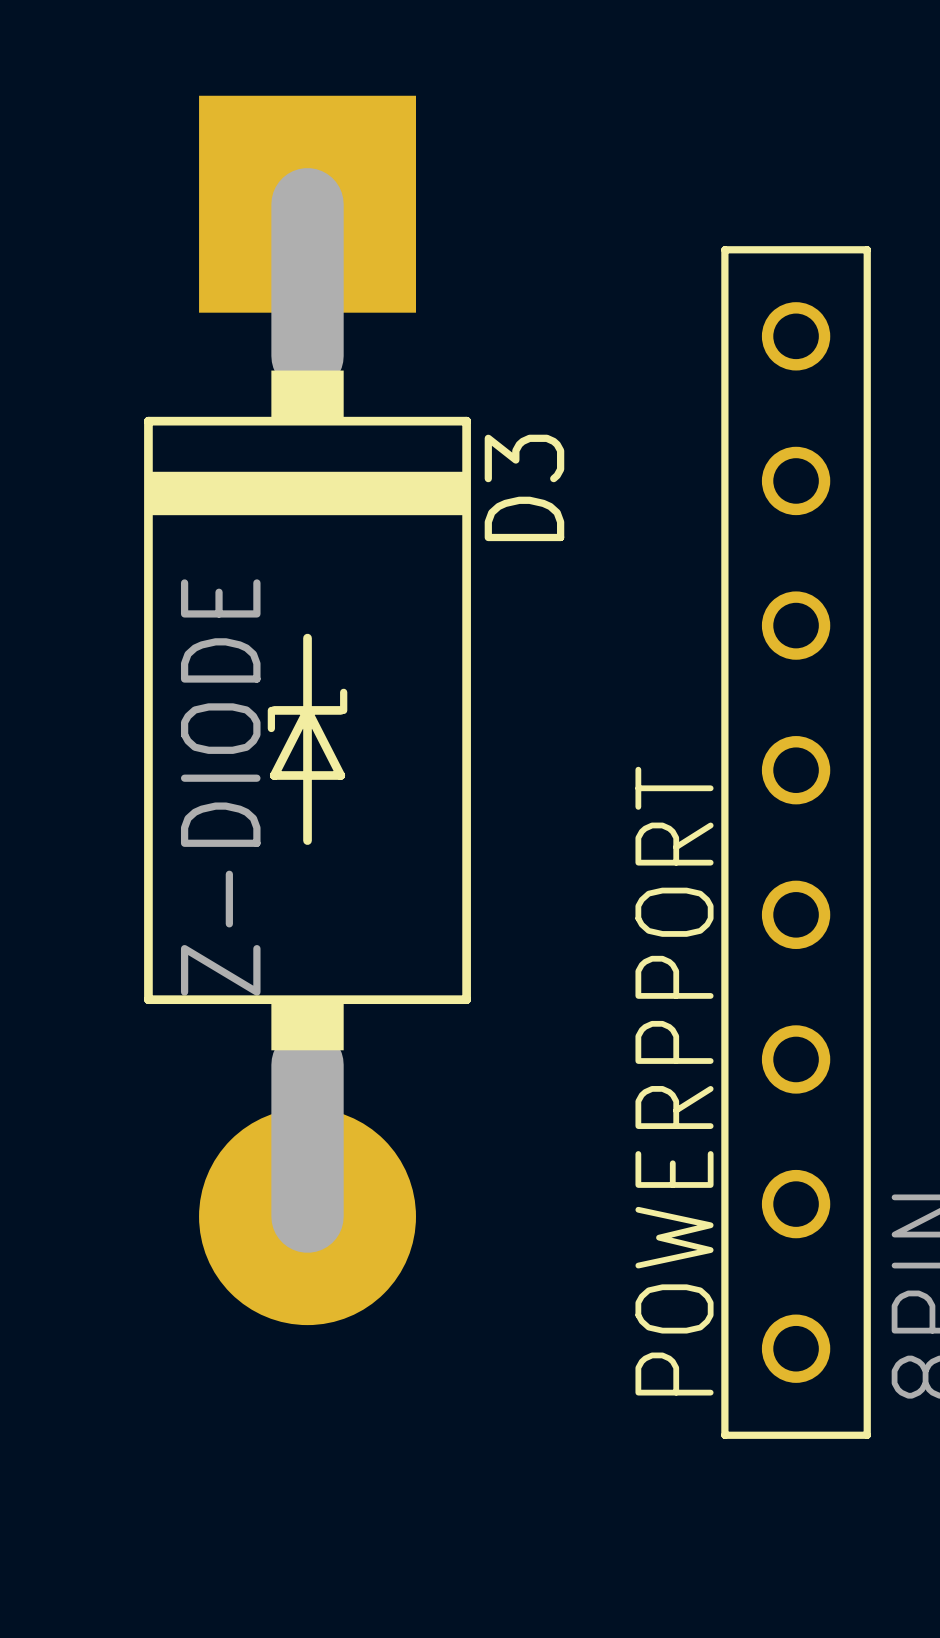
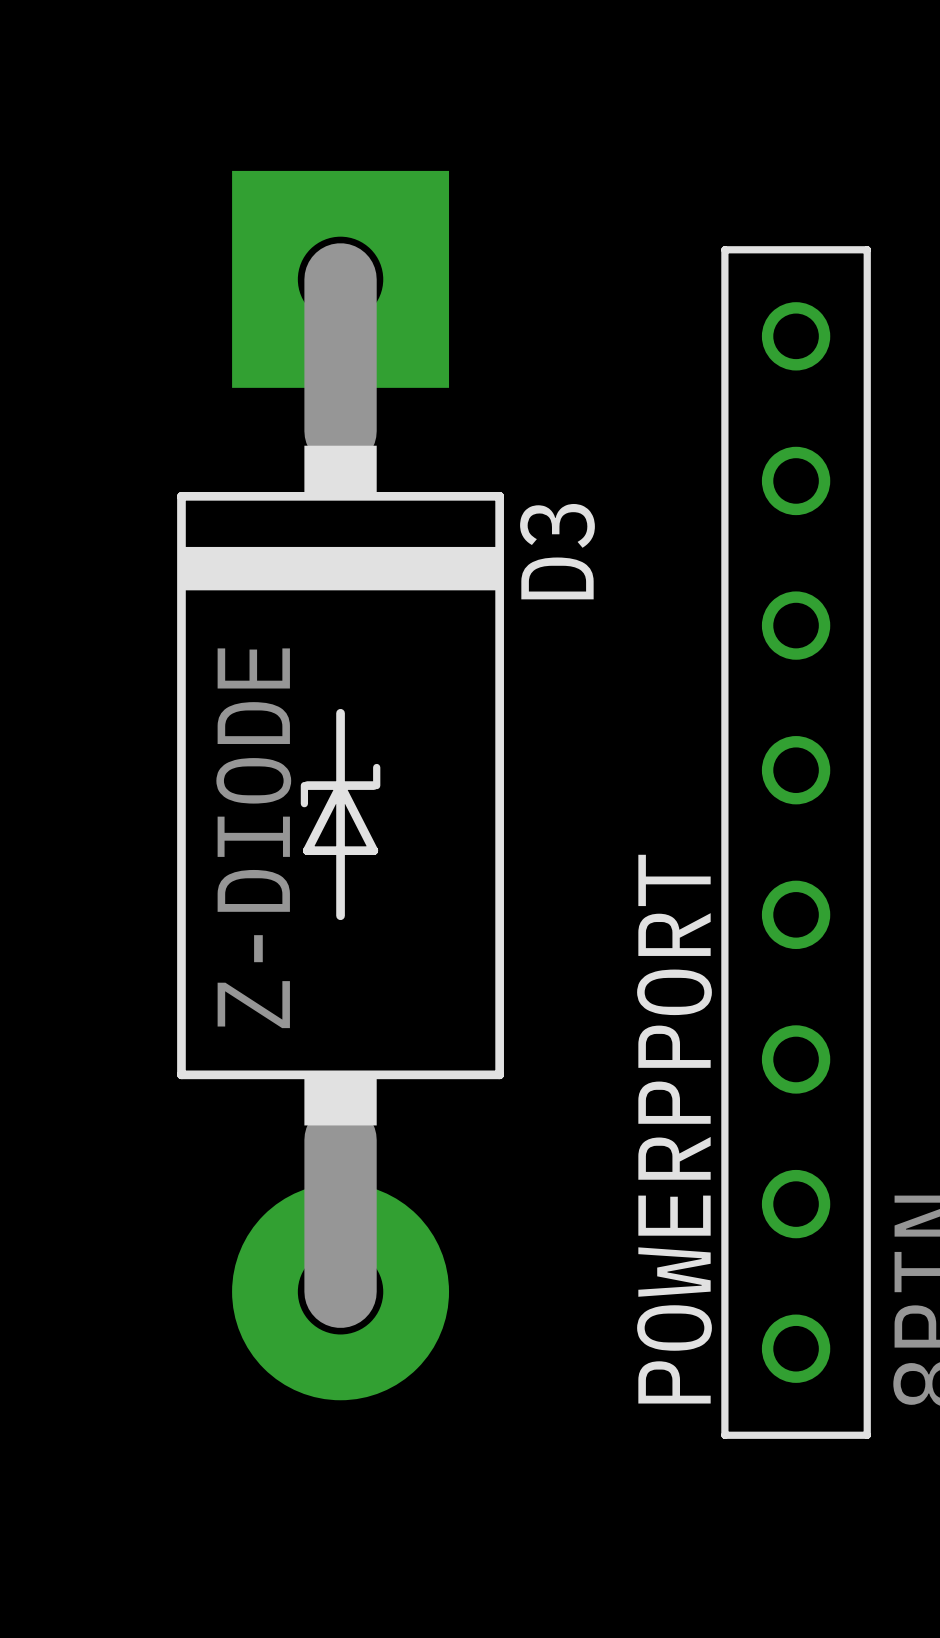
D3 footprint: [144, 95, 471, 1326] -> [177, 170, 504, 1401]

